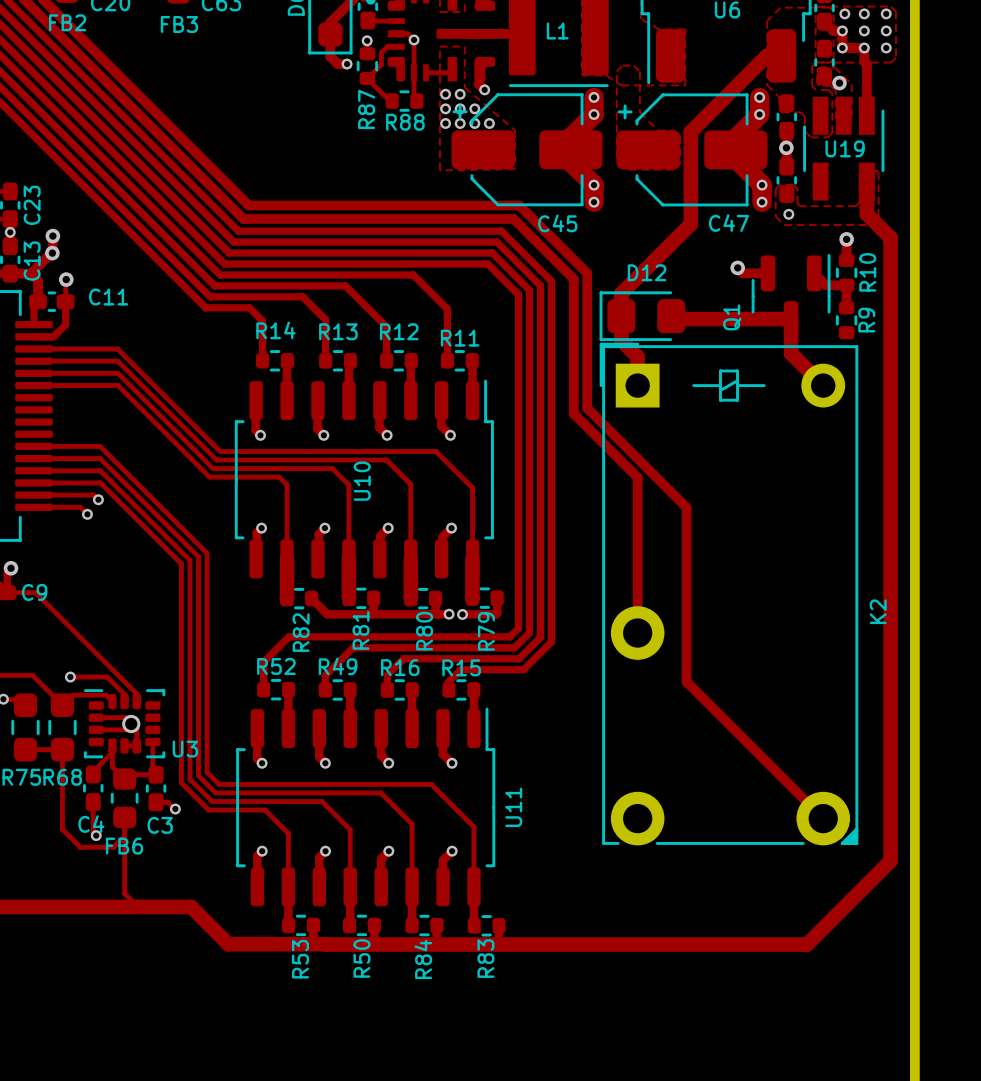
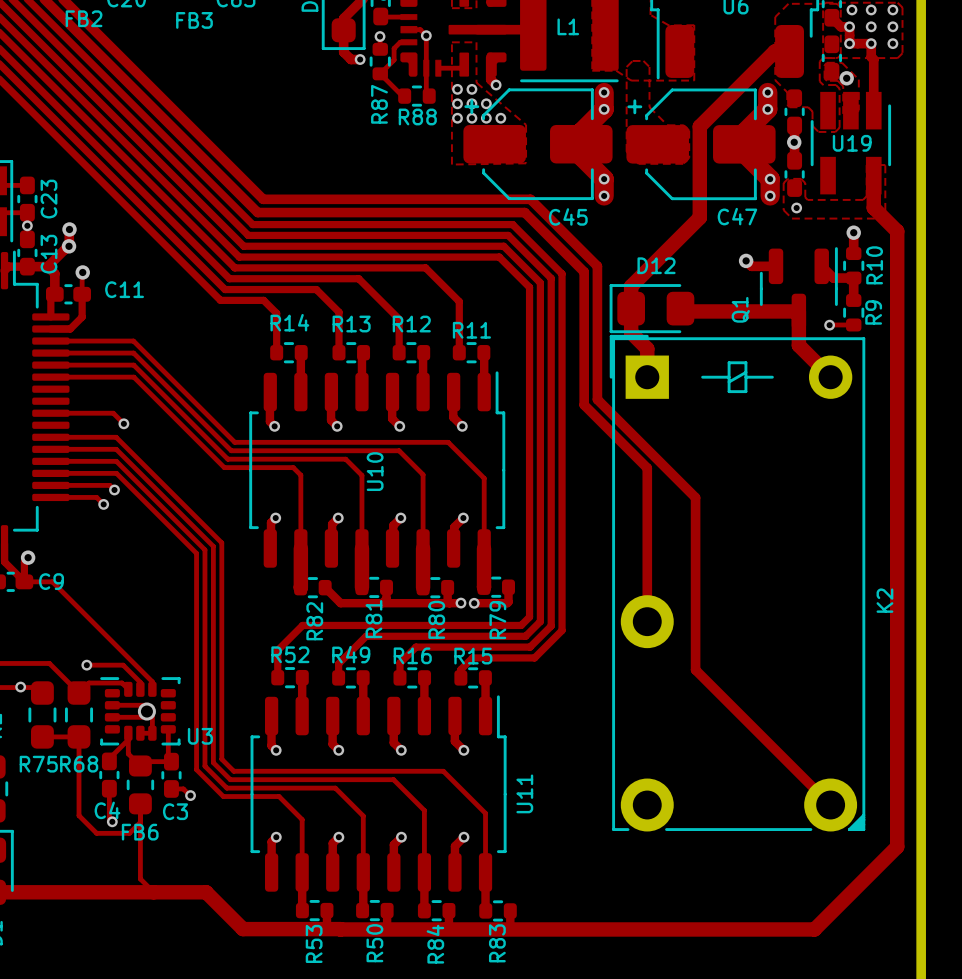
track: none -> (829, 324) (853, 324)
via: none -> (829, 325)
track: none -> (50, 413) (113, 413) (123, 423)
via: none -> (123, 423)

